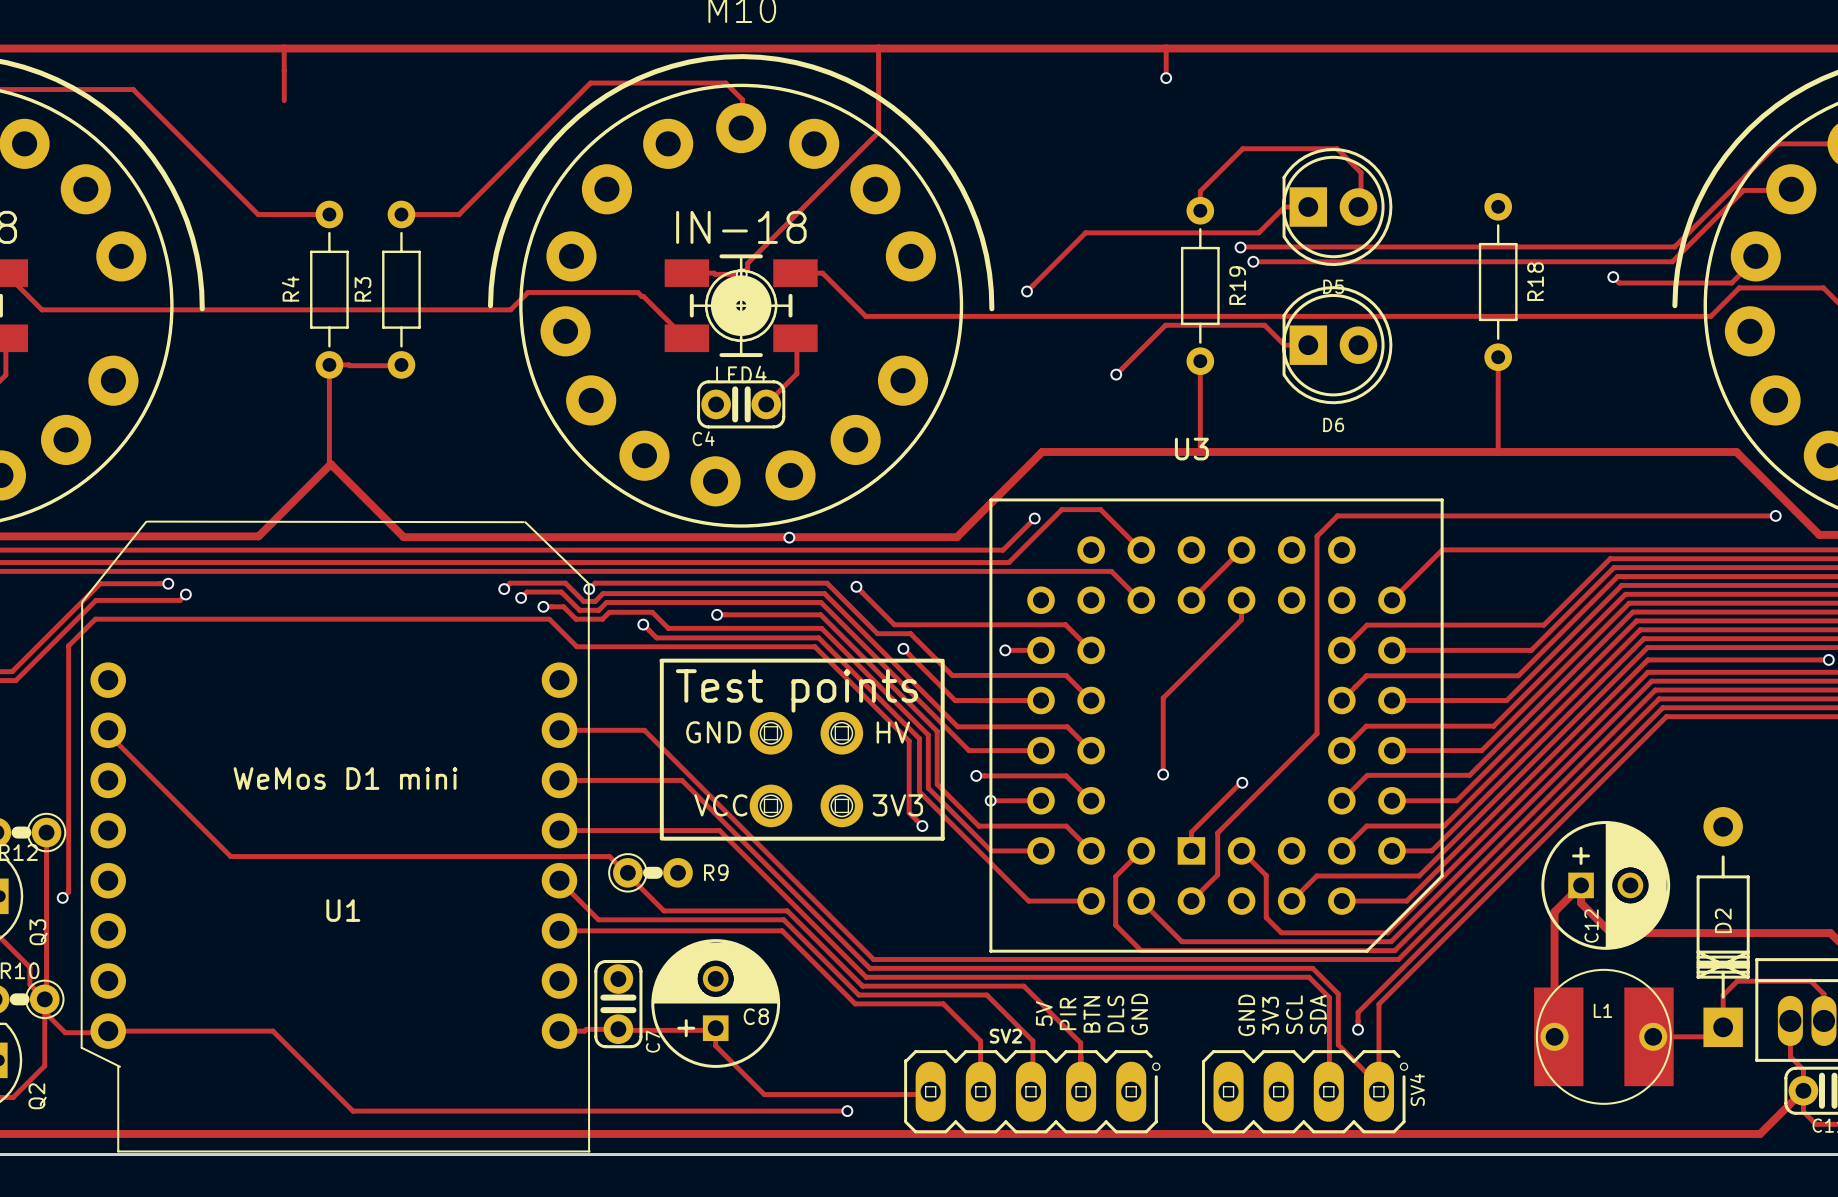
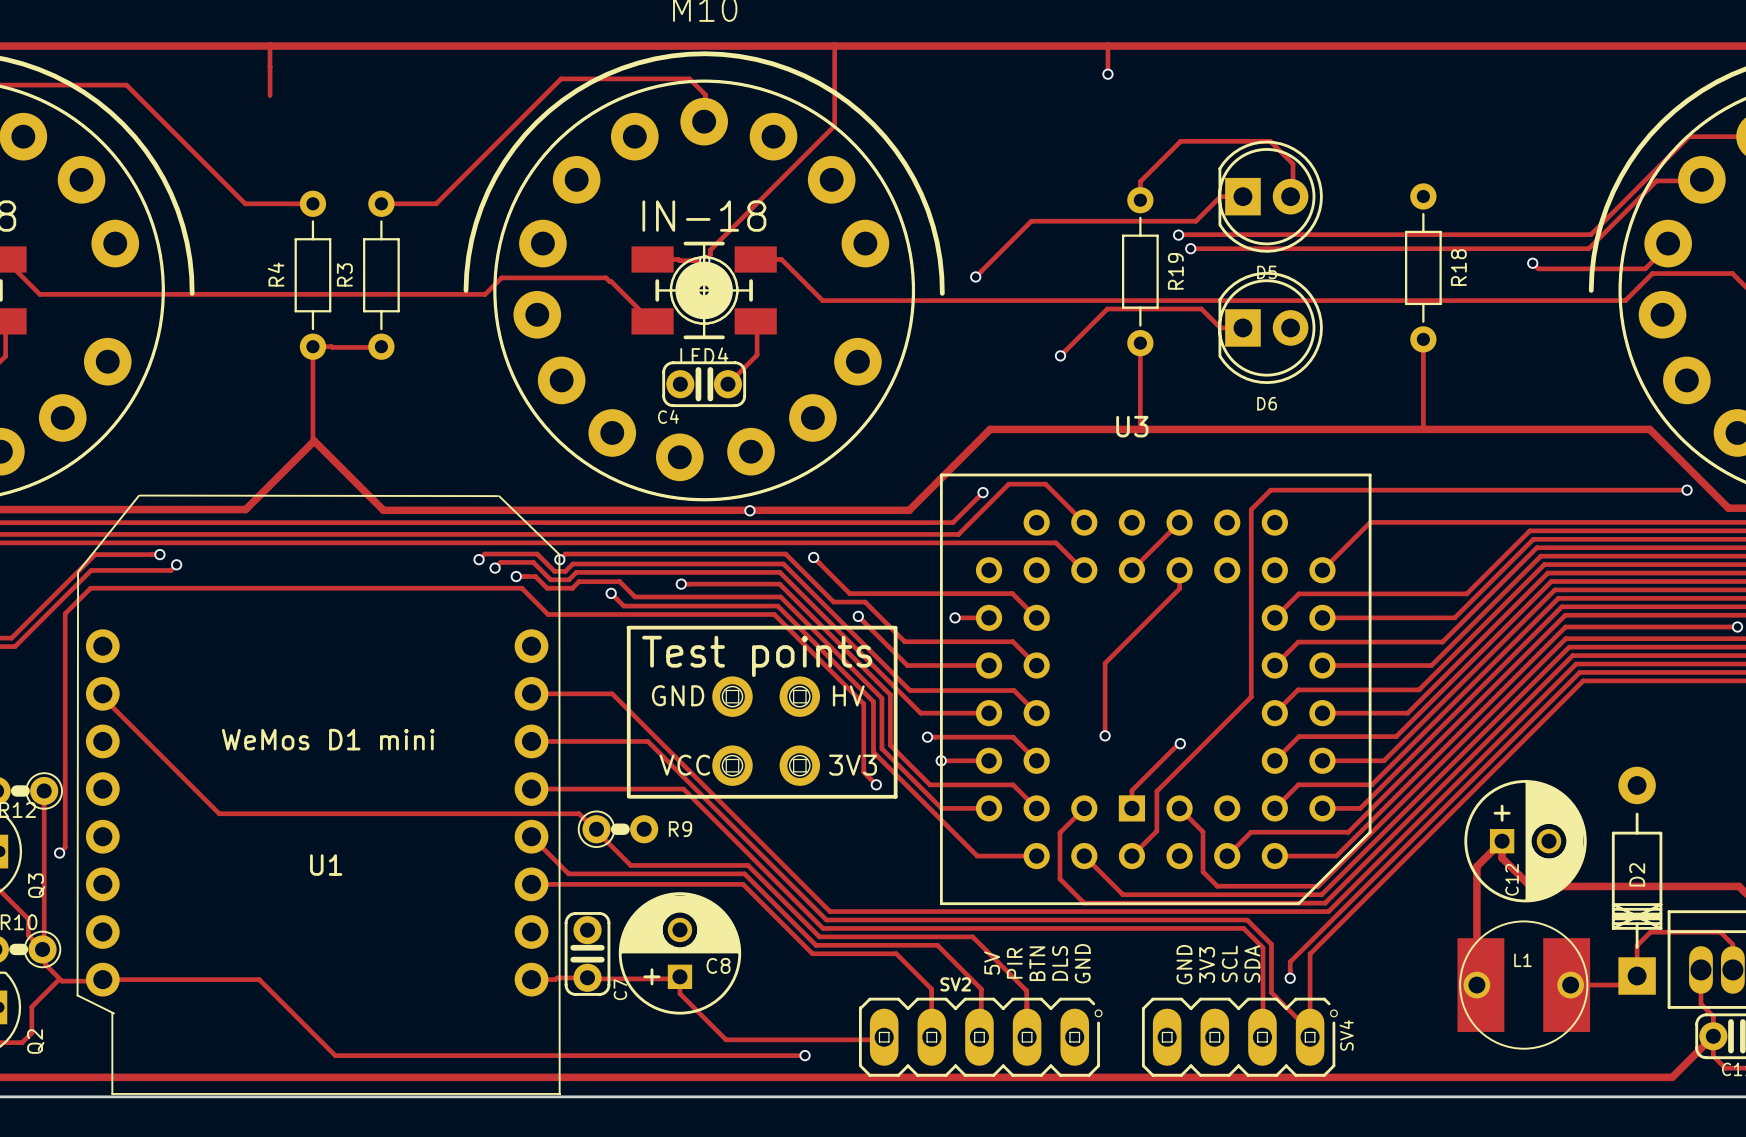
track: (44, 999) (44, 1065) (13, 1097) -> (57, 981) (31, 1006) (31, 1032) (22, 1042) (12, 1042)

